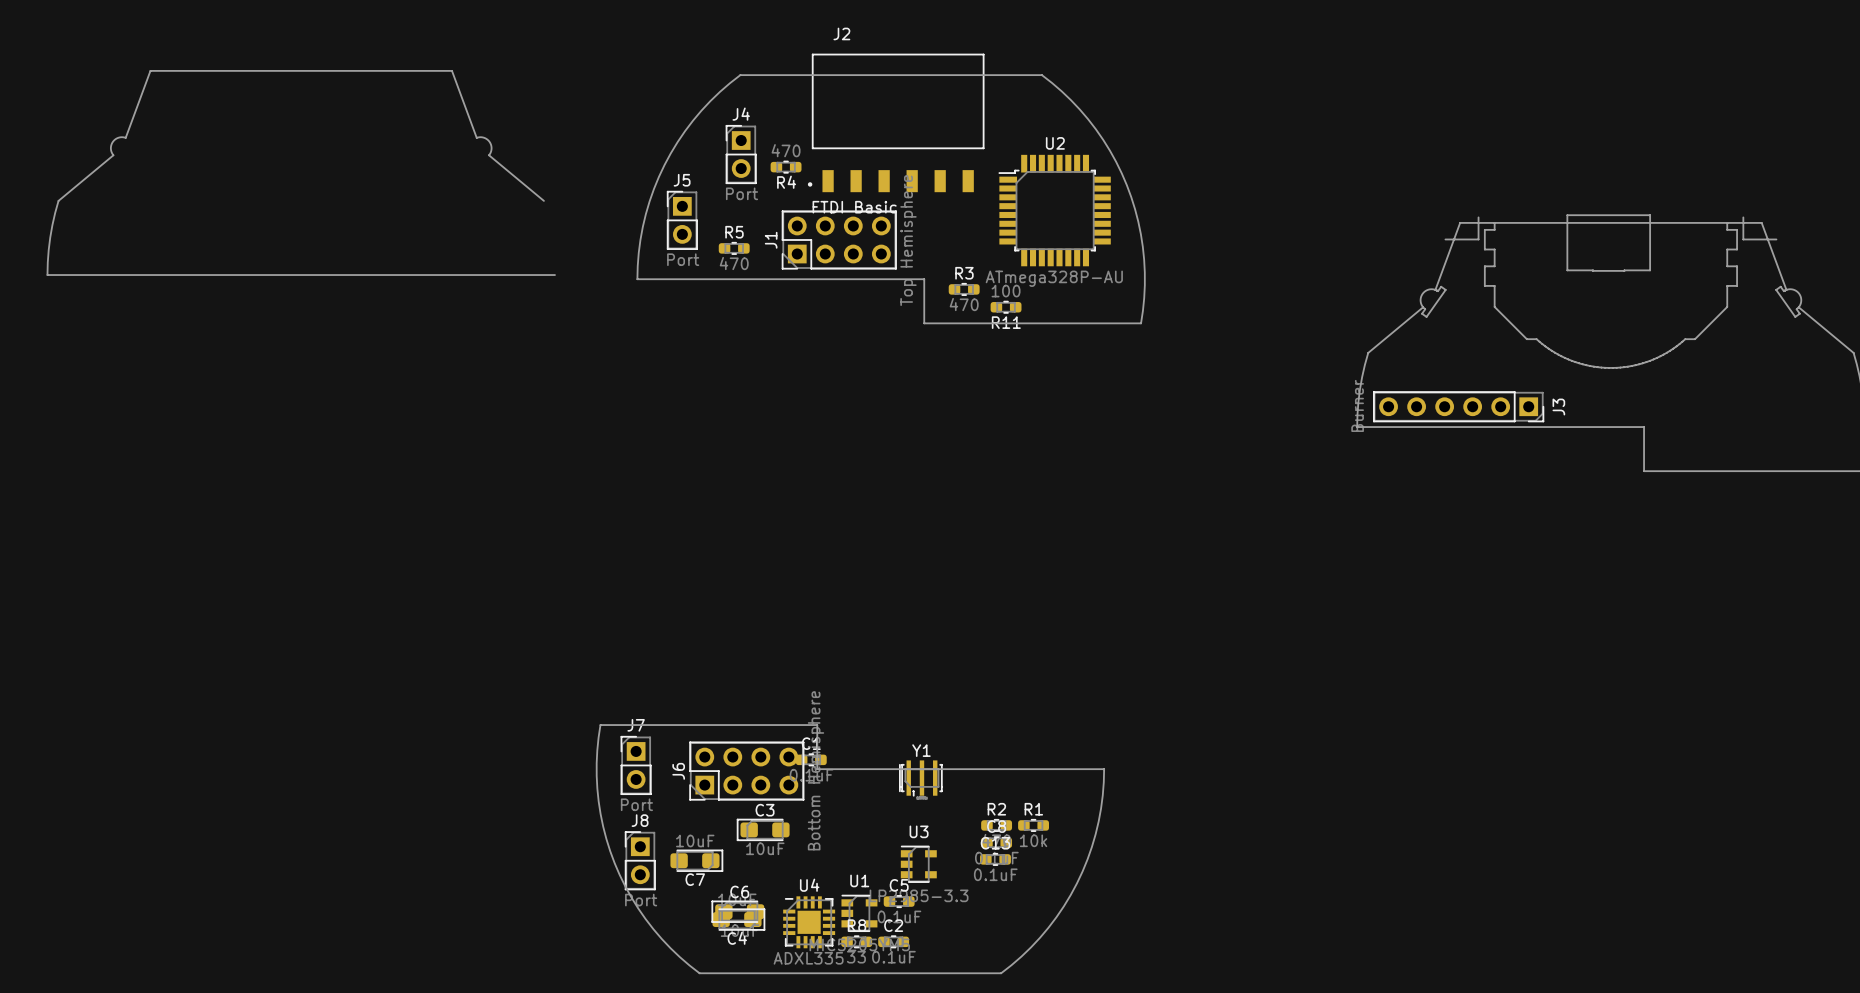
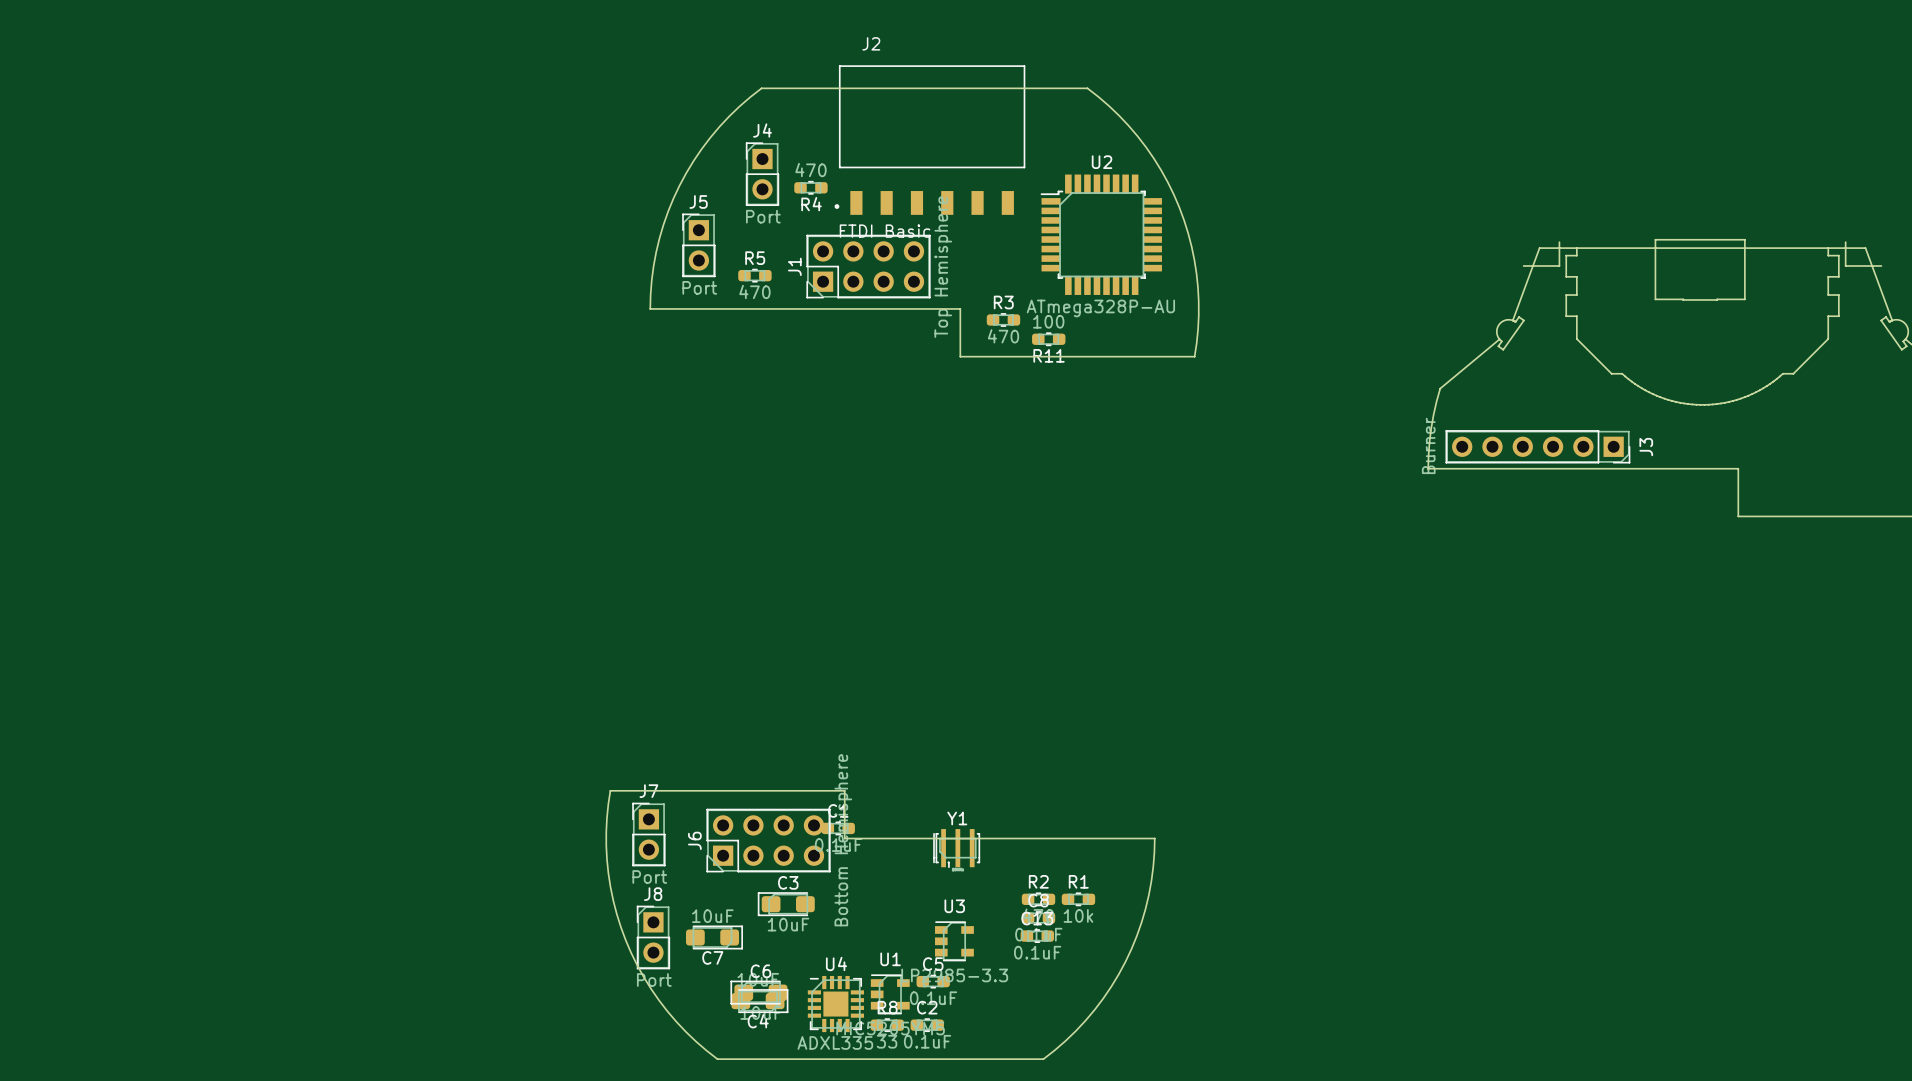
board edge: (543, 200) (489, 155) (490, 144) (485, 138) (476, 137) (452, 70) (150, 70) (125, 137) (114, 139) (110, 147) (113, 155) (58, 200) (50, 237) (47, 275) (555, 275) -> none

